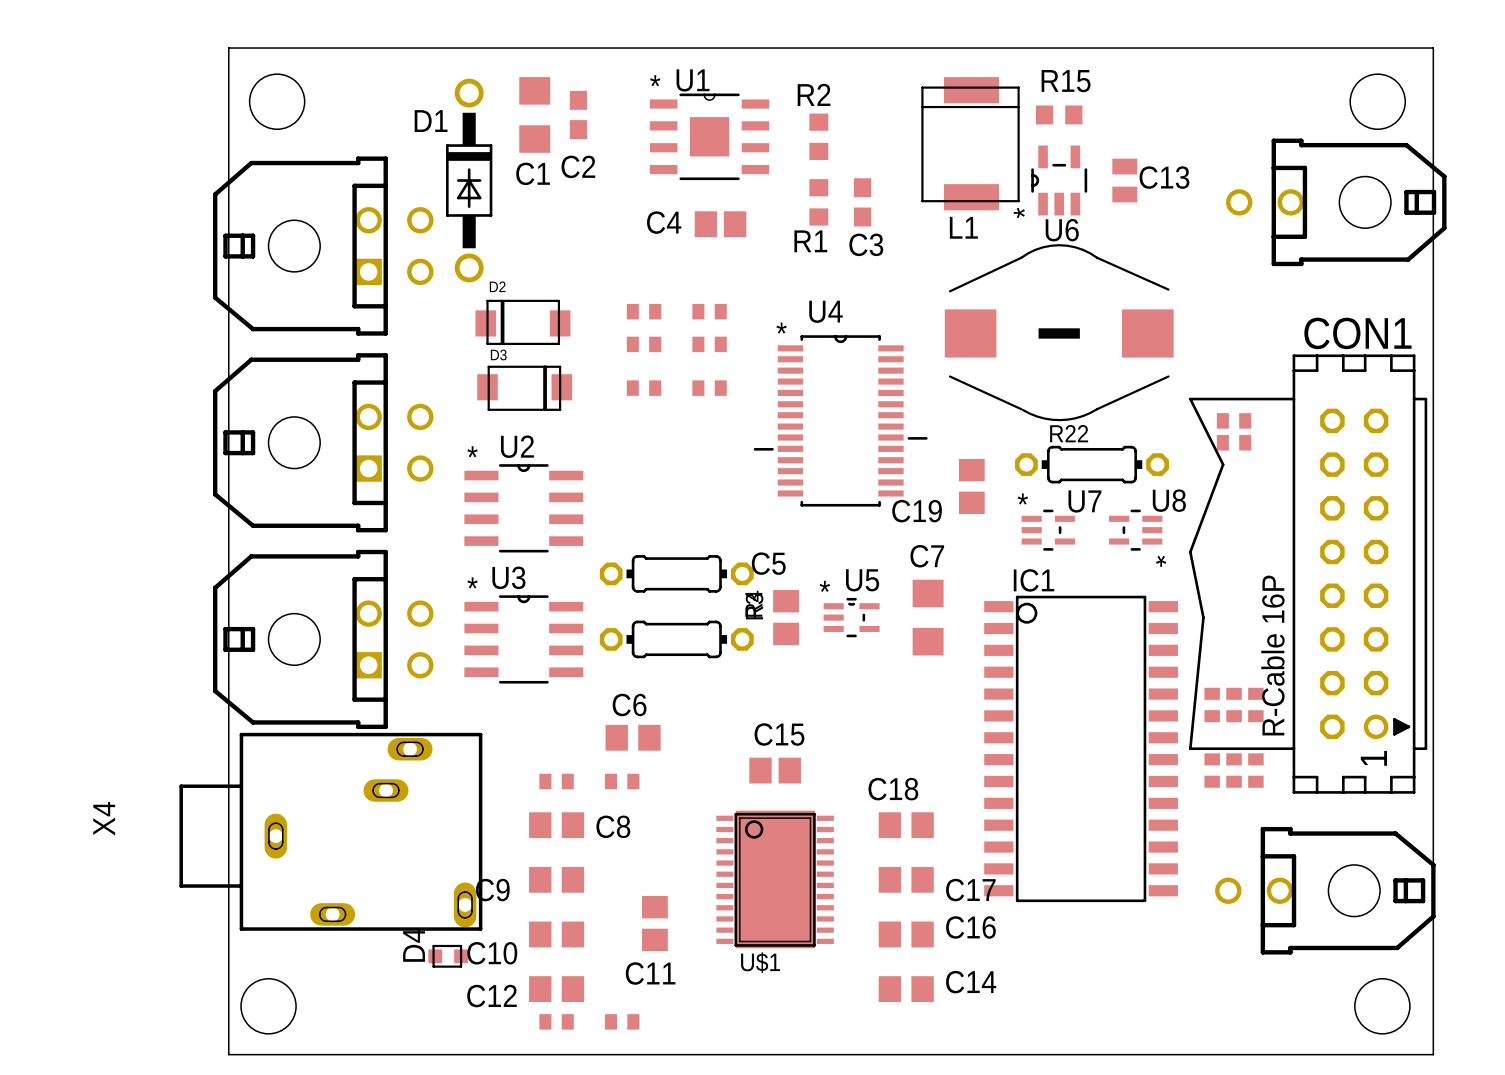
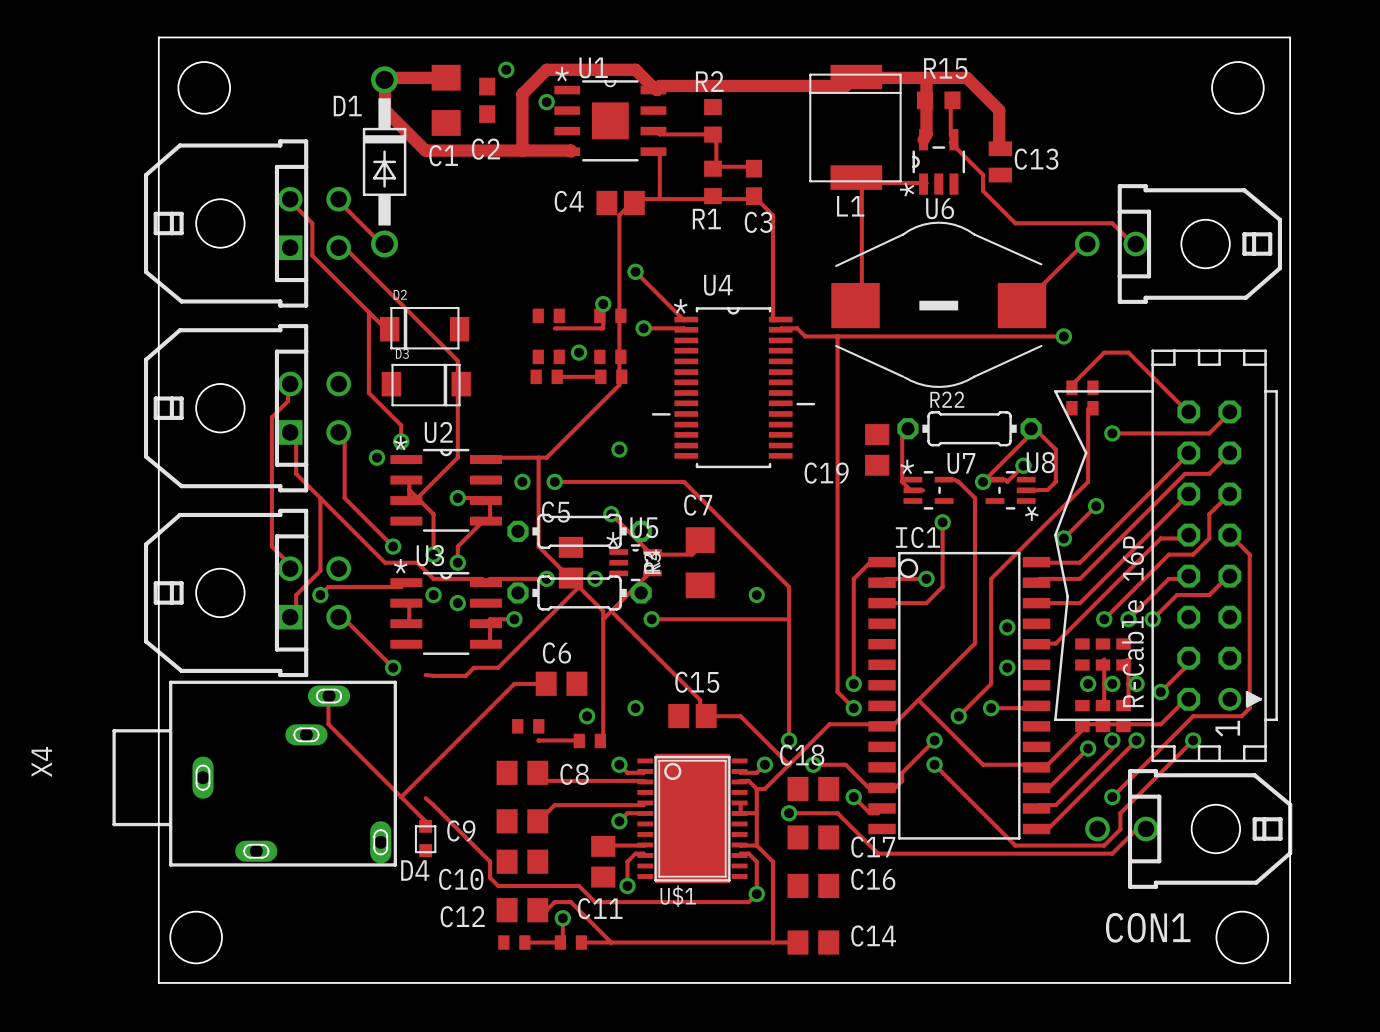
via: none -> (506, 69)
track: none -> (446, 77) (385, 77) (385, 110) (425, 150) (570, 151)
track: none -> (926, 77) (926, 134) (923, 139)
track: none -> (952, 100) (950, 102) (950, 134) (953, 139) (950, 142) (983, 174) (983, 191) (1015, 223) (1112, 223) (1135, 244)
via: none -> (546, 102)
track: none -> (657, 131) (659, 134) (712, 134) (716, 142) (716, 166)
track: none -> (1000, 148) (999, 110) (966, 77) (856, 77) (845, 85) (659, 85) (657, 90) (635, 69) (546, 69) (522, 94) (522, 150)
track: none -> (657, 151) (659, 150) (659, 199)
track: none -> (716, 166) (748, 166) (754, 168)
track: none -> (861, 182) (926, 182) (923, 184)
track: none -> (861, 182) (861, 304) (855, 305)
part position: (1336, 202) -> (1178, 244)
track: none -> (290, 199) (312, 223) (312, 255) (385, 328) (389, 329)
track: none -> (338, 199) (376, 239) (384, 244)
track: none -> (1087, 244) (1080, 247) (1022, 305)
track: none -> (338, 247) (344, 247) (457, 360) (457, 376) (461, 384) (457, 384) (457, 457) (417, 498) (406, 500) (409, 498) (409, 481) (406, 480)
track: none -> (635, 271) (684, 320) (686, 319)
via: none -> (635, 271)
part: (644, 311) -> none
part: (709, 311) -> none
D2 position: (522, 322) -> (424, 328)
track: none -> (603, 304) (603, 328) (554, 328)
via: none -> (603, 304)
CON1 name position: CON1 (1357, 333) -> CON1 (1148, 927)
track: none -> (368, 312) (368, 393) (401, 425) (401, 441)
track: none -> (780, 319) (772, 320) (772, 215) (754, 196) (748, 199) (716, 199) (712, 196) (708, 199) (635, 199) (619, 215) (619, 384) (546, 457) (490, 457) (485, 459)
track: none -> (643, 328) (686, 329)
via: none -> (643, 328)
track: none -> (780, 329) (797, 328) (805, 336) (1063, 336)
track: none -> (837, 336) (837, 692) (853, 708)
via: none -> (1063, 336)
via: none -> (579, 352)
D3 position: (524, 388) -> (426, 385)
part: none -> (546, 376)
track: none -> (554, 376) (603, 376)
part: none -> (611, 376)
track: none -> (290, 383) (288, 384) (288, 401) (271, 417) (271, 546) (288, 562) (290, 568)
track: none -> (1071, 387) (1071, 384) (1104, 352) (1128, 352) (1188, 411)
part: none -> (1082, 387)
part: (1234, 420) -> none
part: none -> (1082, 408)
track: none -> (1092, 408) (1088, 409) (1088, 481) (991, 578) (991, 683) (958, 716)
part: (1234, 442) -> none
track: none -> (1229, 411) (1209, 433) (1112, 433)
track: none -> (290, 432) (296, 433) (296, 473) (385, 562) (417, 562) (433, 578) (482, 578) (485, 582) (490, 578) (546, 578)
track: none -> (338, 432) (344, 433) (344, 498) (393, 546)
track: none -> (910, 433) (902, 433) (902, 481) (910, 489) (923, 490)
via: none -> (1112, 433)
via: none -> (401, 441)
via: none -> (619, 449)
C19 position: (971, 486) -> (877, 449)
track: none -> (1188, 452) (1080, 562) (1036, 561)
track: none -> (1229, 452) (1209, 473) (1185, 473) (1080, 578) (1039, 578) (1036, 582)
via: none -> (376, 457)
track: none -> (538, 457) (538, 546) (603, 611) (603, 740) (600, 740)
track: none -> (1023, 465) (1007, 481) (1005, 479)
via: none -> (1023, 465)
U2 position: (523, 508) -> (446, 490)
track: none -> (954, 479) (974, 498) (974, 643) (894, 724) (882, 726) (877, 724) (829, 724) (764, 788) (756, 788)
via: none -> (522, 481)
track: none -> (554, 481) (684, 481) (789, 586) (789, 740)
via: none -> (554, 481)
track: none -> (983, 481) (1031, 433) (1039, 433) (1055, 449) (1055, 481) (1047, 489) (1036, 490)
via: none -> (983, 481)
track: none -> (409, 489) (433, 514) (433, 554)
track: none -> (1188, 494) (1080, 603) (1036, 602)
track: none -> (1229, 494) (1209, 514) (1209, 538) (1193, 554) (1168, 554) (1104, 619)
track: none -> (320, 498) (320, 570) (296, 595) (296, 611) (290, 617)
track: none -> (457, 498) (482, 498) (485, 500) (490, 498) (490, 522) (482, 522) (457, 546) (457, 562)
via: none -> (457, 498)
track: none -> (1096, 506) (1063, 538)
via: none -> (1096, 506)
track: none -> (611, 514) (651, 554) (652, 552) (659, 554) (692, 554) (700, 546) (700, 540)
via: none -> (611, 514)
track: none -> (942, 522) (942, 586) (926, 603) (882, 602)
via: none -> (942, 522)
CON1 position: (1308, 574) -> (1166, 555)
track: none -> (1188, 535) (1185, 538) (1160, 538) (1055, 643) (1036, 644)
track: none -> (1229, 535) (1249, 554) (1249, 708) (1241, 716) (1193, 716) (1112, 797)
via: none -> (1063, 538)
via: none -> (393, 546)
via: none -> (433, 554)
track: none -> (882, 561) (869, 562) (853, 578) (853, 683)
via: none -> (457, 562)
C5 position: (786, 617) -> (570, 562)
U5 position: (851, 617) -> (635, 562)
C7 position: (928, 617) -> (700, 562)
track: none -> (652, 573) (651, 570) (603, 619)
track: none -> (1188, 576) (1185, 578) (1168, 578) (1128, 619)
track: none -> (1229, 576) (1209, 595) (1176, 595) (1152, 619)
via: none -> (546, 578)
track: none -> (570, 578) (579, 586) (498, 667) (473, 667) (465, 675) (425, 675)
via: none -> (595, 578)
track: none -> (926, 578) (886, 578) (882, 582)
via: none -> (926, 578)
track: none -> (406, 582) (401, 586) (328, 586) (320, 595)
U3 position: (523, 639) -> (446, 613)
via: none -> (320, 595)
via: none -> (433, 595)
via: none -> (756, 595)
track: none -> (406, 603) (409, 603) (409, 619) (406, 623)
via: none -> (457, 603)
track: none -> (611, 611) (700, 700) (700, 708) (706, 716) (740, 716) (789, 764)
track: none -> (338, 617) (344, 619) (393, 667)
track: none -> (514, 619) (490, 619) (485, 623) (490, 627) (490, 643) (485, 644)
via: none -> (514, 619)
track: none -> (651, 619) (789, 619)
via: none -> (651, 619)
via: none -> (1104, 619)
via: none -> (1128, 619)
via: none -> (1152, 619)
via: none -> (1007, 627)
track: none -> (1188, 658) (1193, 659) (1160, 692)
track: none -> (1102, 661) (1104, 659) (1104, 700) (1102, 702)
track: none -> (1122, 661) (1128, 659) (1128, 700) (1122, 702)
via: none -> (393, 667)
via: none -> (1007, 667)
track: none -> (546, 683) (514, 683) (401, 797)
via: none -> (853, 683)
via: none -> (1088, 683)
via: none -> (1112, 683)
via: none -> (1136, 683)
C6 position: (633, 737) -> (561, 683)
via: none -> (1160, 692)
track: none -> (326, 696) (328, 724) (425, 821) (425, 826)
track: none -> (1188, 699) (1185, 700) (1160, 724) (1088, 724)
track: none -> (918, 700) (983, 764) (1031, 764) (1036, 767) (1039, 764) (1047, 764) (1088, 724)
track: none -> (1036, 705) (1031, 708) (991, 708)
via: none -> (635, 708)
via: none -> (853, 708)
via: none -> (991, 708)
via: none -> (587, 716)
C15 position: (775, 770) -> (692, 716)
via: none -> (958, 716)
part: (556, 781) -> none
via: none -> (789, 740)
track: none -> (934, 740) (902, 772) (902, 780) (894, 788) (869, 788) (845, 764) (813, 764)
via: none -> (934, 740)
track: none -> (1112, 740) (1112, 748) (1055, 805) (1039, 805) (1036, 808)
via: none -> (1112, 740)
track: none -> (1136, 740) (1047, 829) (1036, 828)
via: none -> (1136, 740)
track: none -> (1193, 740) (1120, 813) (1120, 829) (1104, 845) (1015, 845) (934, 764)
via: none -> (1193, 740)
track: none -> (538, 740) (579, 740)
part: none -> (589, 740)
track: none -> (1088, 748) (1047, 788) (1036, 787)
via: none -> (1088, 748)
track: none -> (619, 764) (627, 772) (645, 771)
via: none -> (619, 764)
track: none -> (764, 764) (756, 772) (739, 771)
via: none -> (764, 764)
via: none -> (813, 764)
via: none -> (934, 764)
C8 position: (556, 825) -> (522, 772)
C18 position: (906, 825) -> (813, 788)
track: none -> (537, 772) (546, 780) (645, 781)
track: none -> (739, 781) (748, 780) (756, 788)
track: none -> (756, 788) (756, 845)
track: none -> (853, 797) (869, 813) (877, 813) (882, 808)
via: none -> (853, 797)
via: none -> (1112, 797)
track: none -> (425, 798) (490, 861) (490, 877) (498, 885) (579, 885) (595, 902) (748, 902) (756, 894) (756, 861) (748, 853) (740, 853) (739, 855)
track: none -> (645, 802) (643, 805) (554, 805) (537, 821)
track: none -> (739, 802) (740, 813)
track: none -> (740, 813) (756, 813)
track: none -> (789, 813) (837, 813) (877, 853) (1112, 853) (1136, 829) (1143, 826)
via: none -> (789, 813)
track: none -> (645, 813) (627, 813) (619, 821)
C9 position: (556, 879) -> (522, 821)
U$1 position: (775, 879) -> (692, 818)
C17 position: (906, 879) -> (813, 837)
via: none -> (619, 821)
track: none -> (645, 844) (603, 846)
track: none -> (739, 844) (756, 845)
track: none -> (756, 845) (772, 861) (772, 942)
track: none -> (645, 855) (643, 853) (635, 853) (627, 861) (627, 885)
C11 position: (654, 923) -> (603, 861)
C10 position: (556, 934) -> (522, 861)
C16 position: (906, 934) -> (813, 885)
via: none -> (627, 885)
D4 rotation: 0° (448, 956) -> 90° counterclockwise (425, 838)
D4 position: (448, 956) -> (425, 838)
via: none -> (756, 894)
track: none -> (537, 910) (546, 910) (554, 902) (570, 902) (611, 942)
track: none -> (562, 918) (562, 942) (522, 942)
via: none -> (562, 918)
C12 position: (556, 989) -> (522, 910)
C14 position: (906, 989) -> (813, 942)
part: none -> (570, 942)
track: none -> (579, 942) (797, 942)
part: (556, 1021) -> none
part position: (622, 1021) -> (514, 942)

